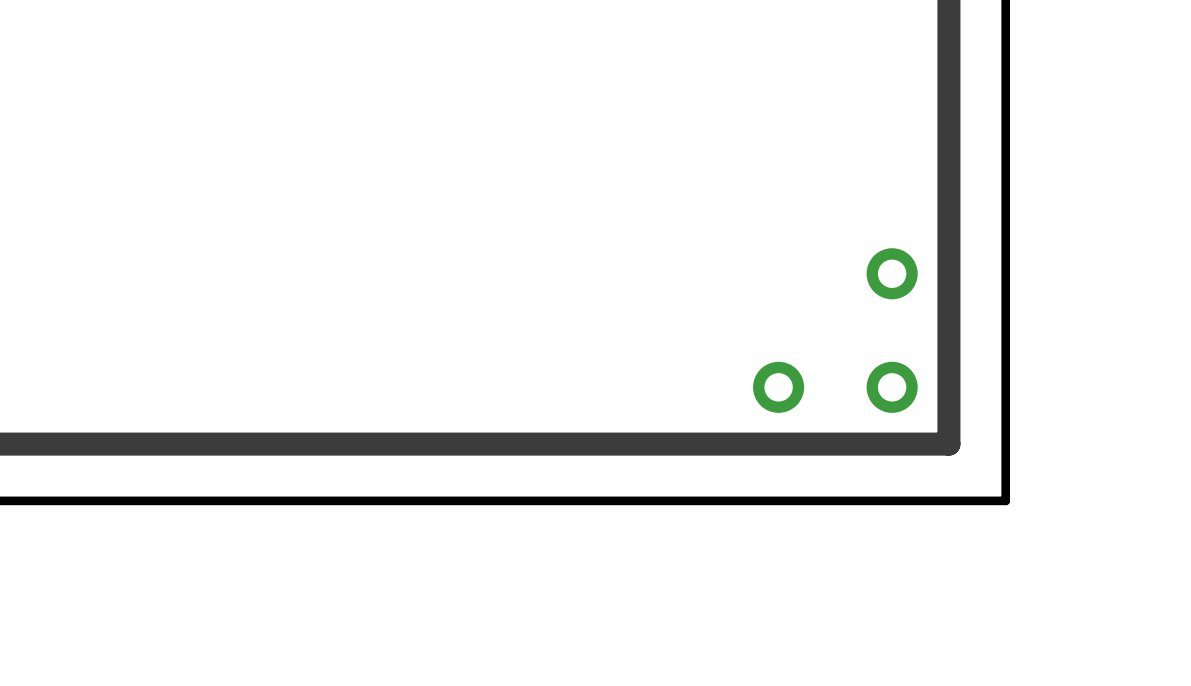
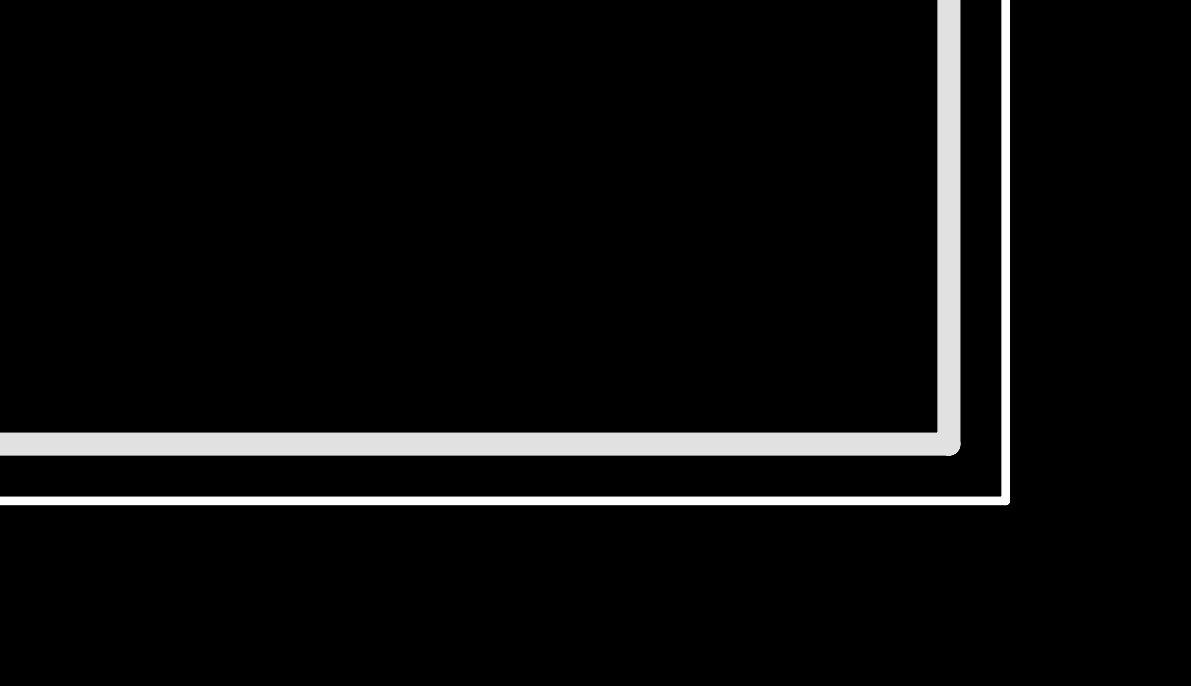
via: (892, 273) -> none
via: (778, 387) -> none
via: (892, 387) -> none

